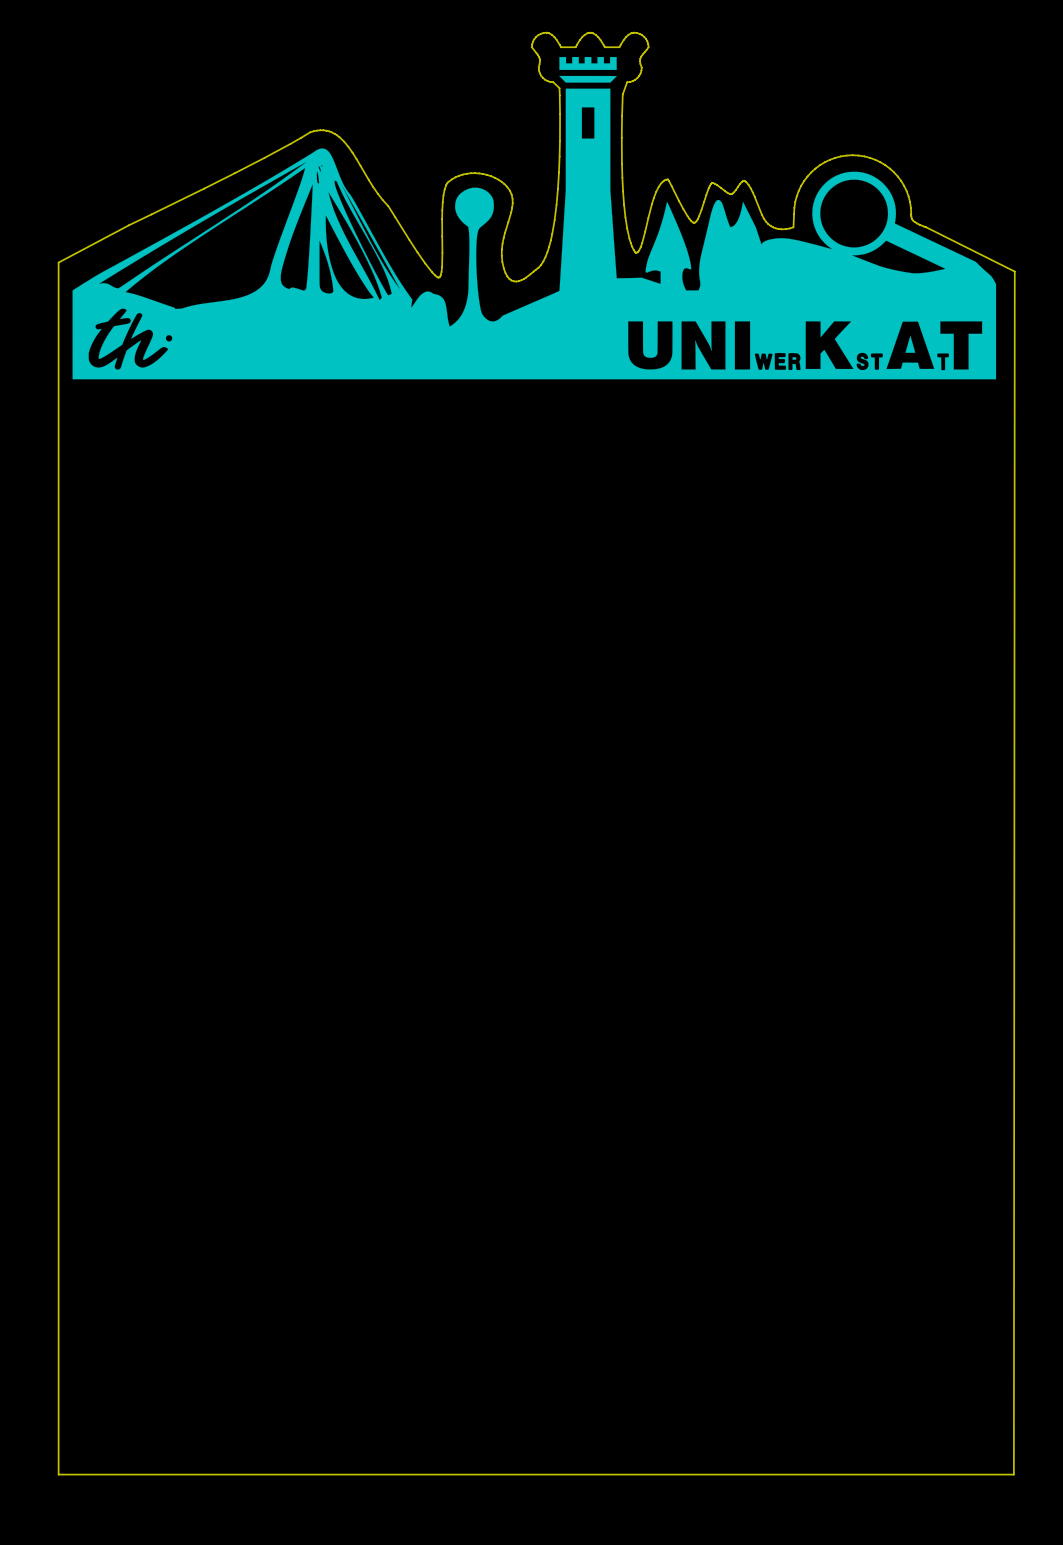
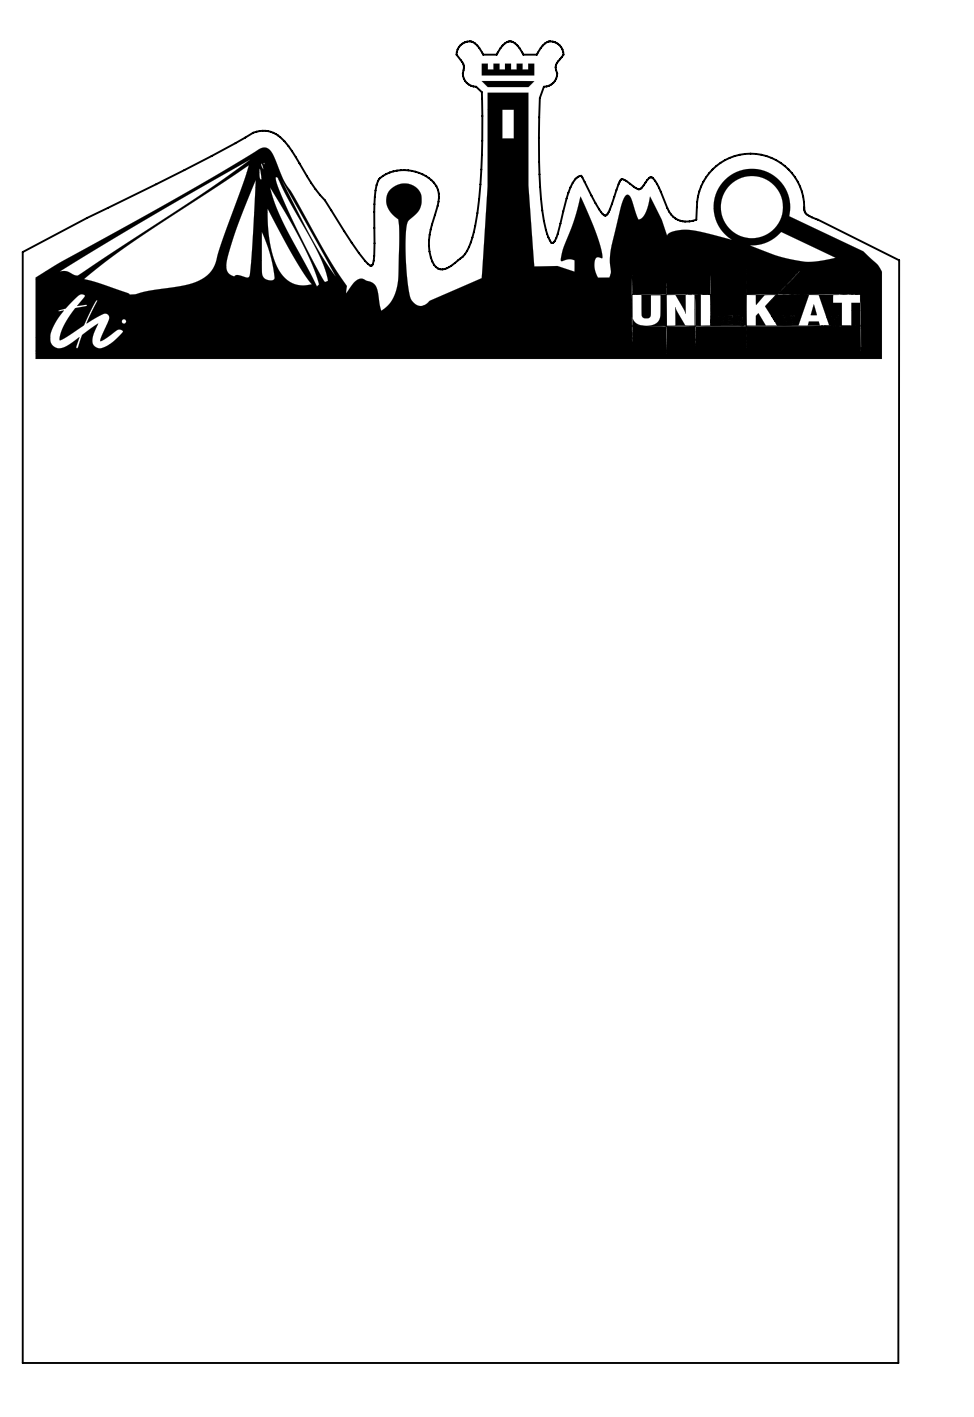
drawing shape: [72, 56, 997, 380] -> [35, 63, 883, 360]

